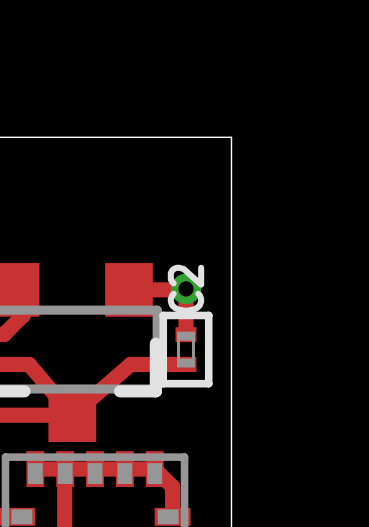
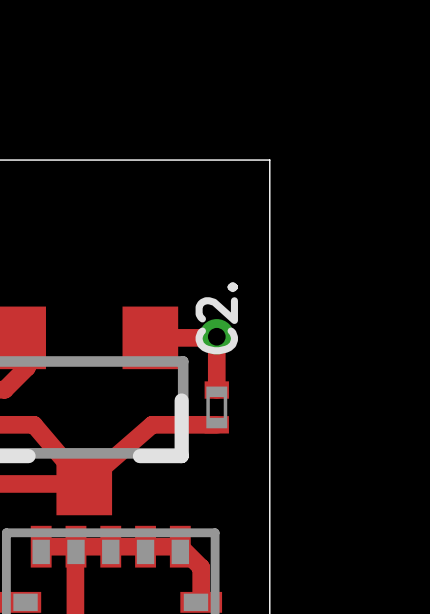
C2 name: C2 (185, 289) -> C2. (216, 318)
line: (163, 315) (163, 383) (208, 383) (208, 315) (163, 315) -> none

